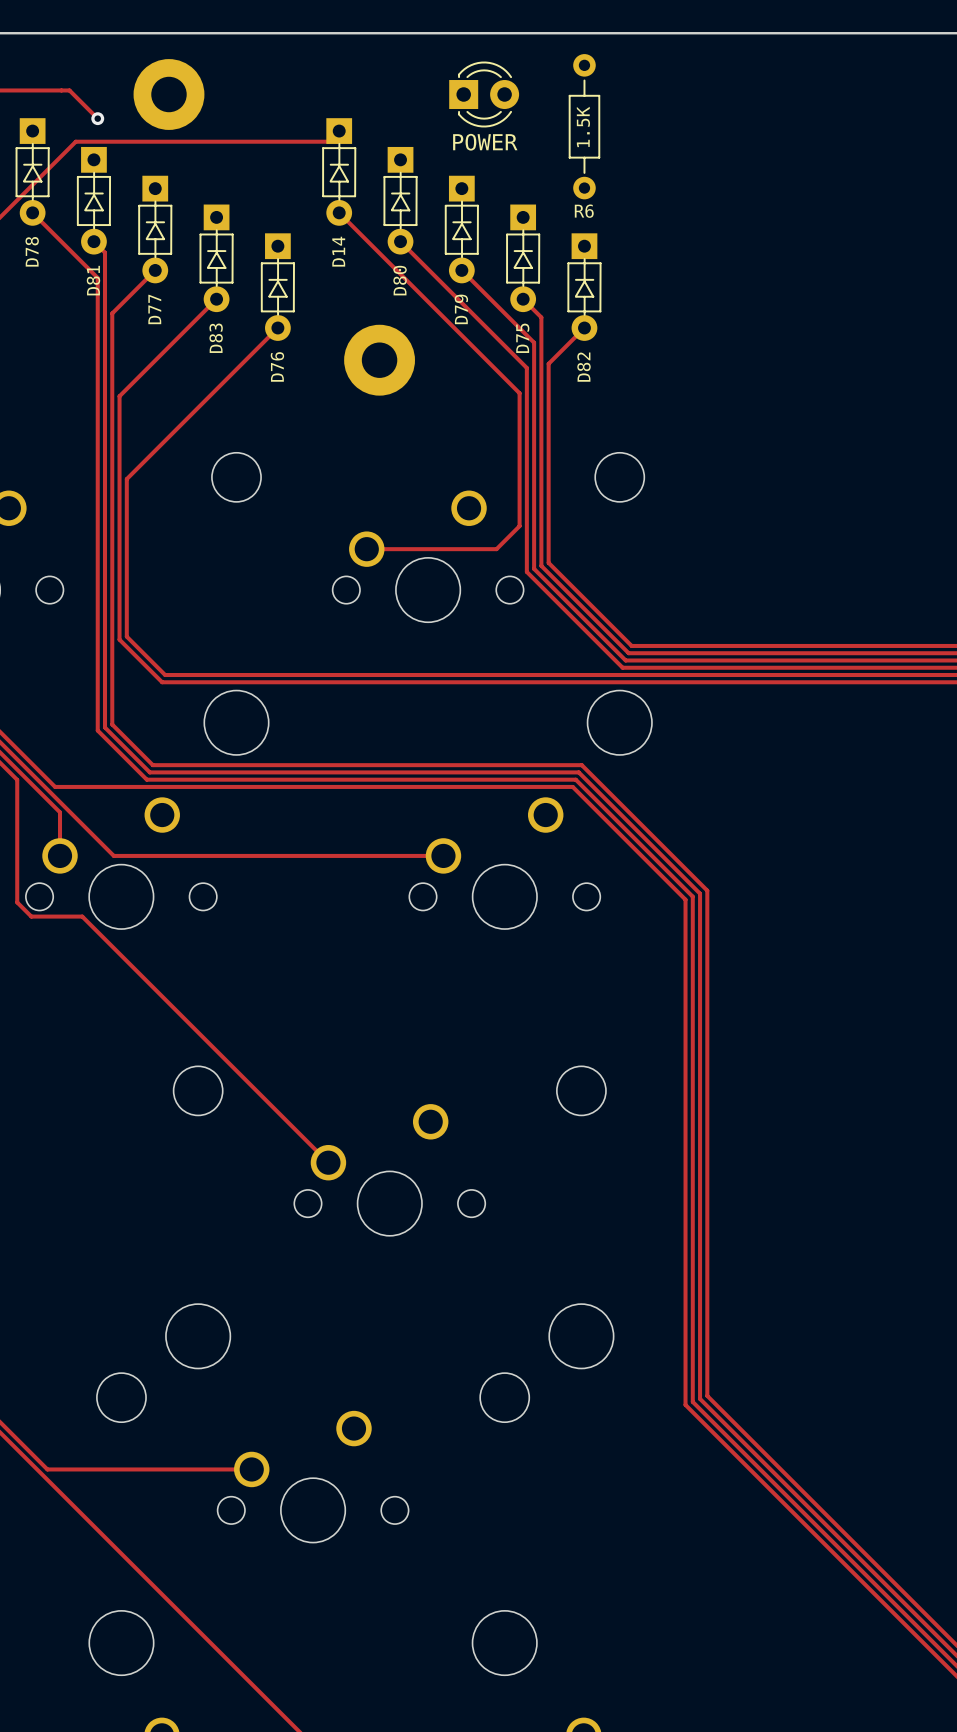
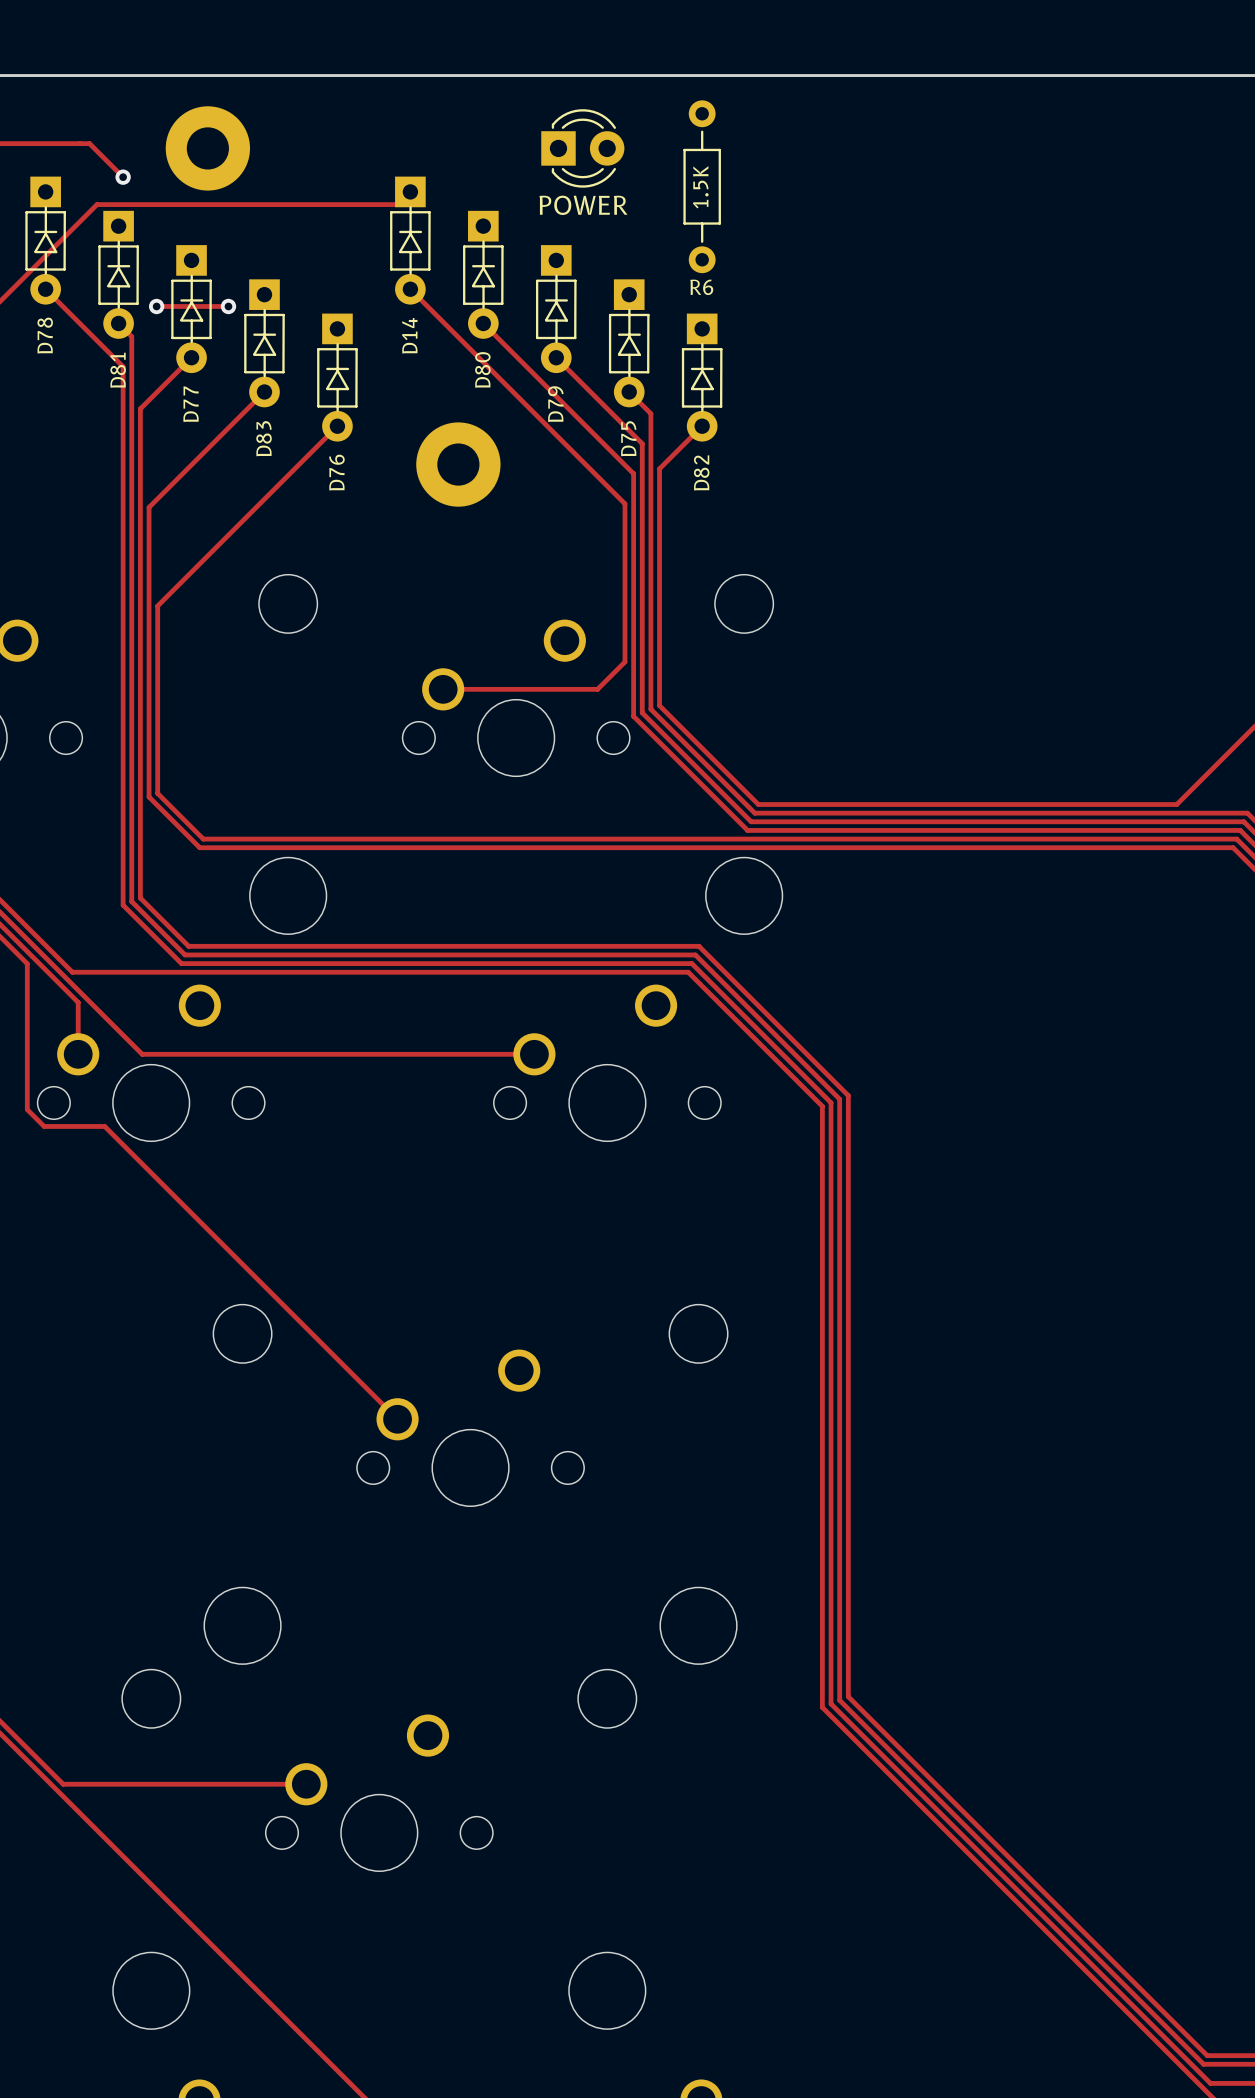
track: none -> (156, 306) (228, 306)
via: none -> (156, 306)
via: none -> (228, 306)

